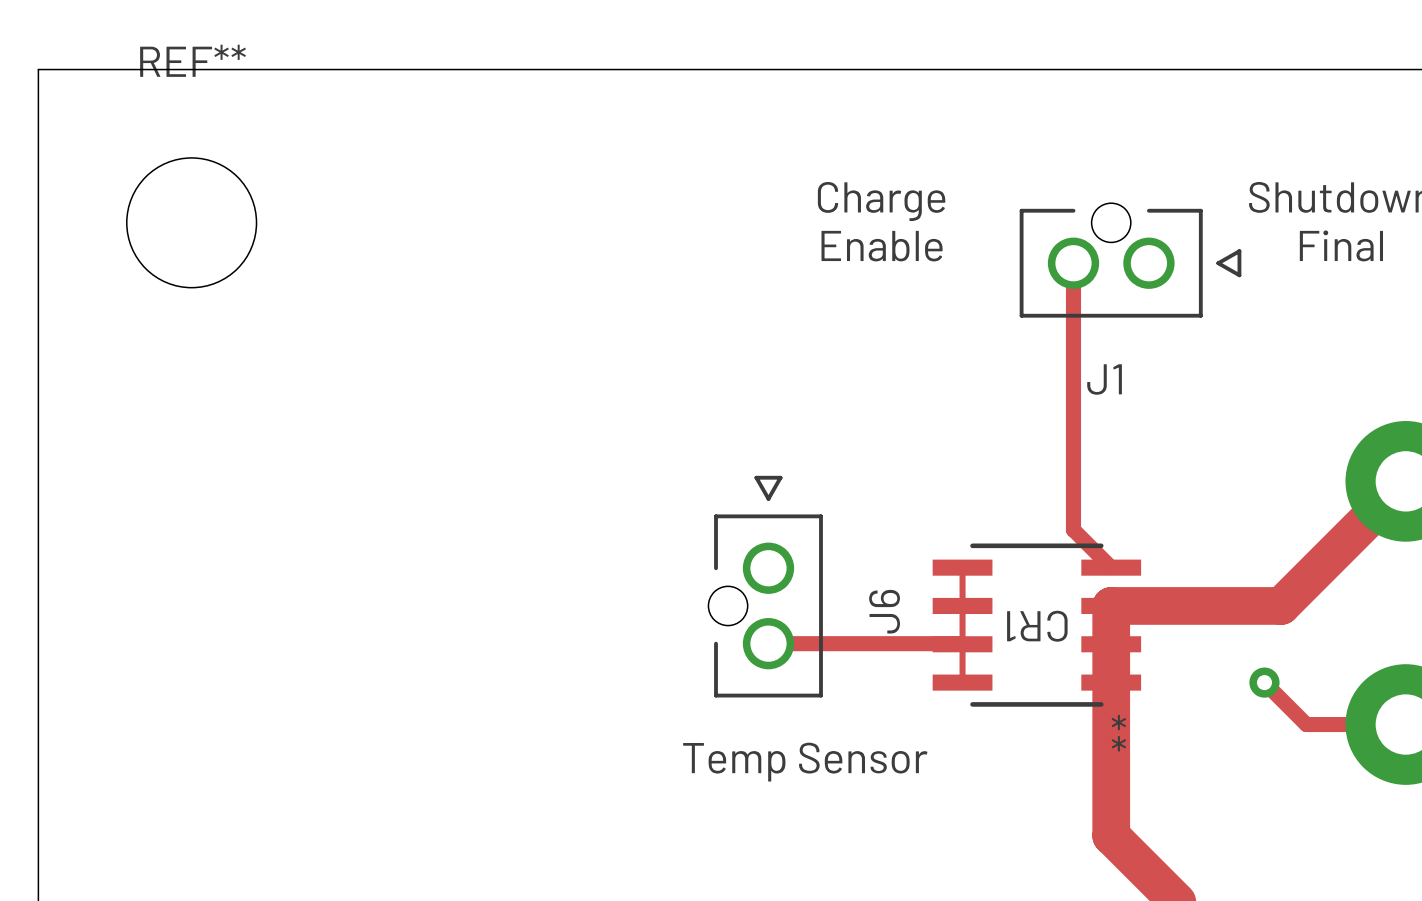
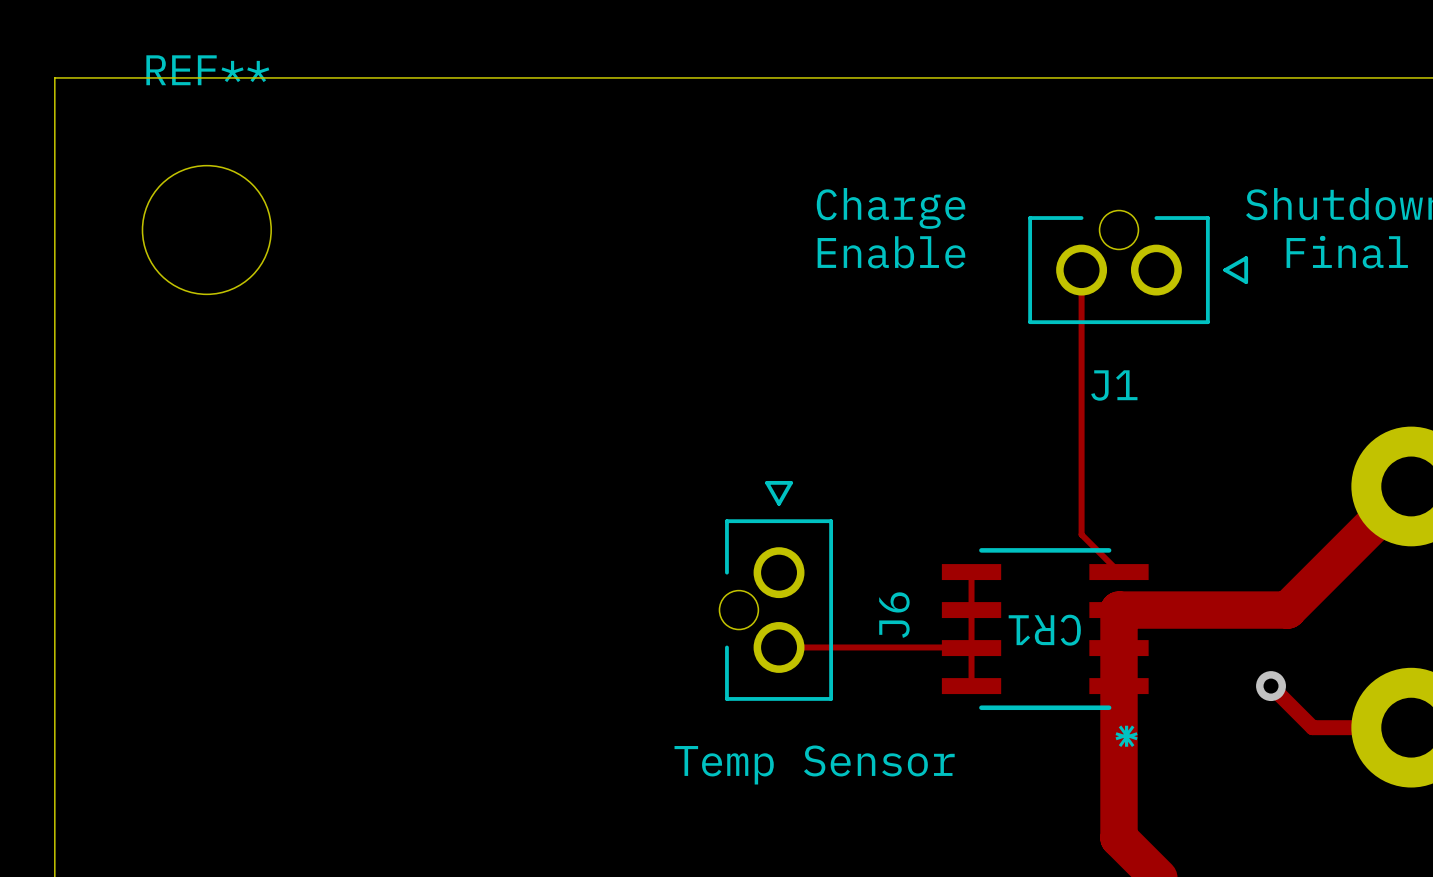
track width: thick (1073, 263) (1073, 529) (1111, 567) -> thin (1081, 270) (1081, 534) (1118, 572)
track width: thick (768, 643) (961, 643) -> thin (779, 647) (970, 647)

